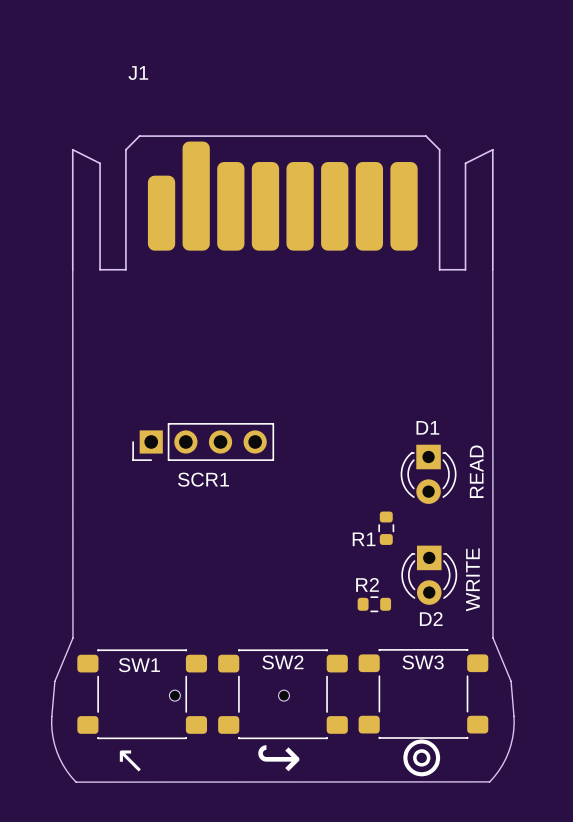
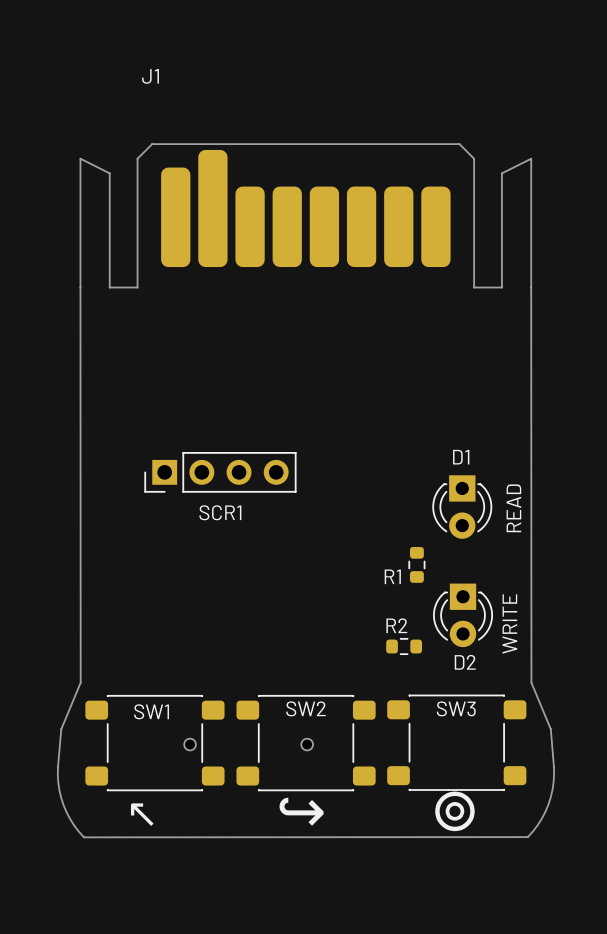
J1 footprint: [71, 135, 494, 271] -> [79, 143, 533, 289]

